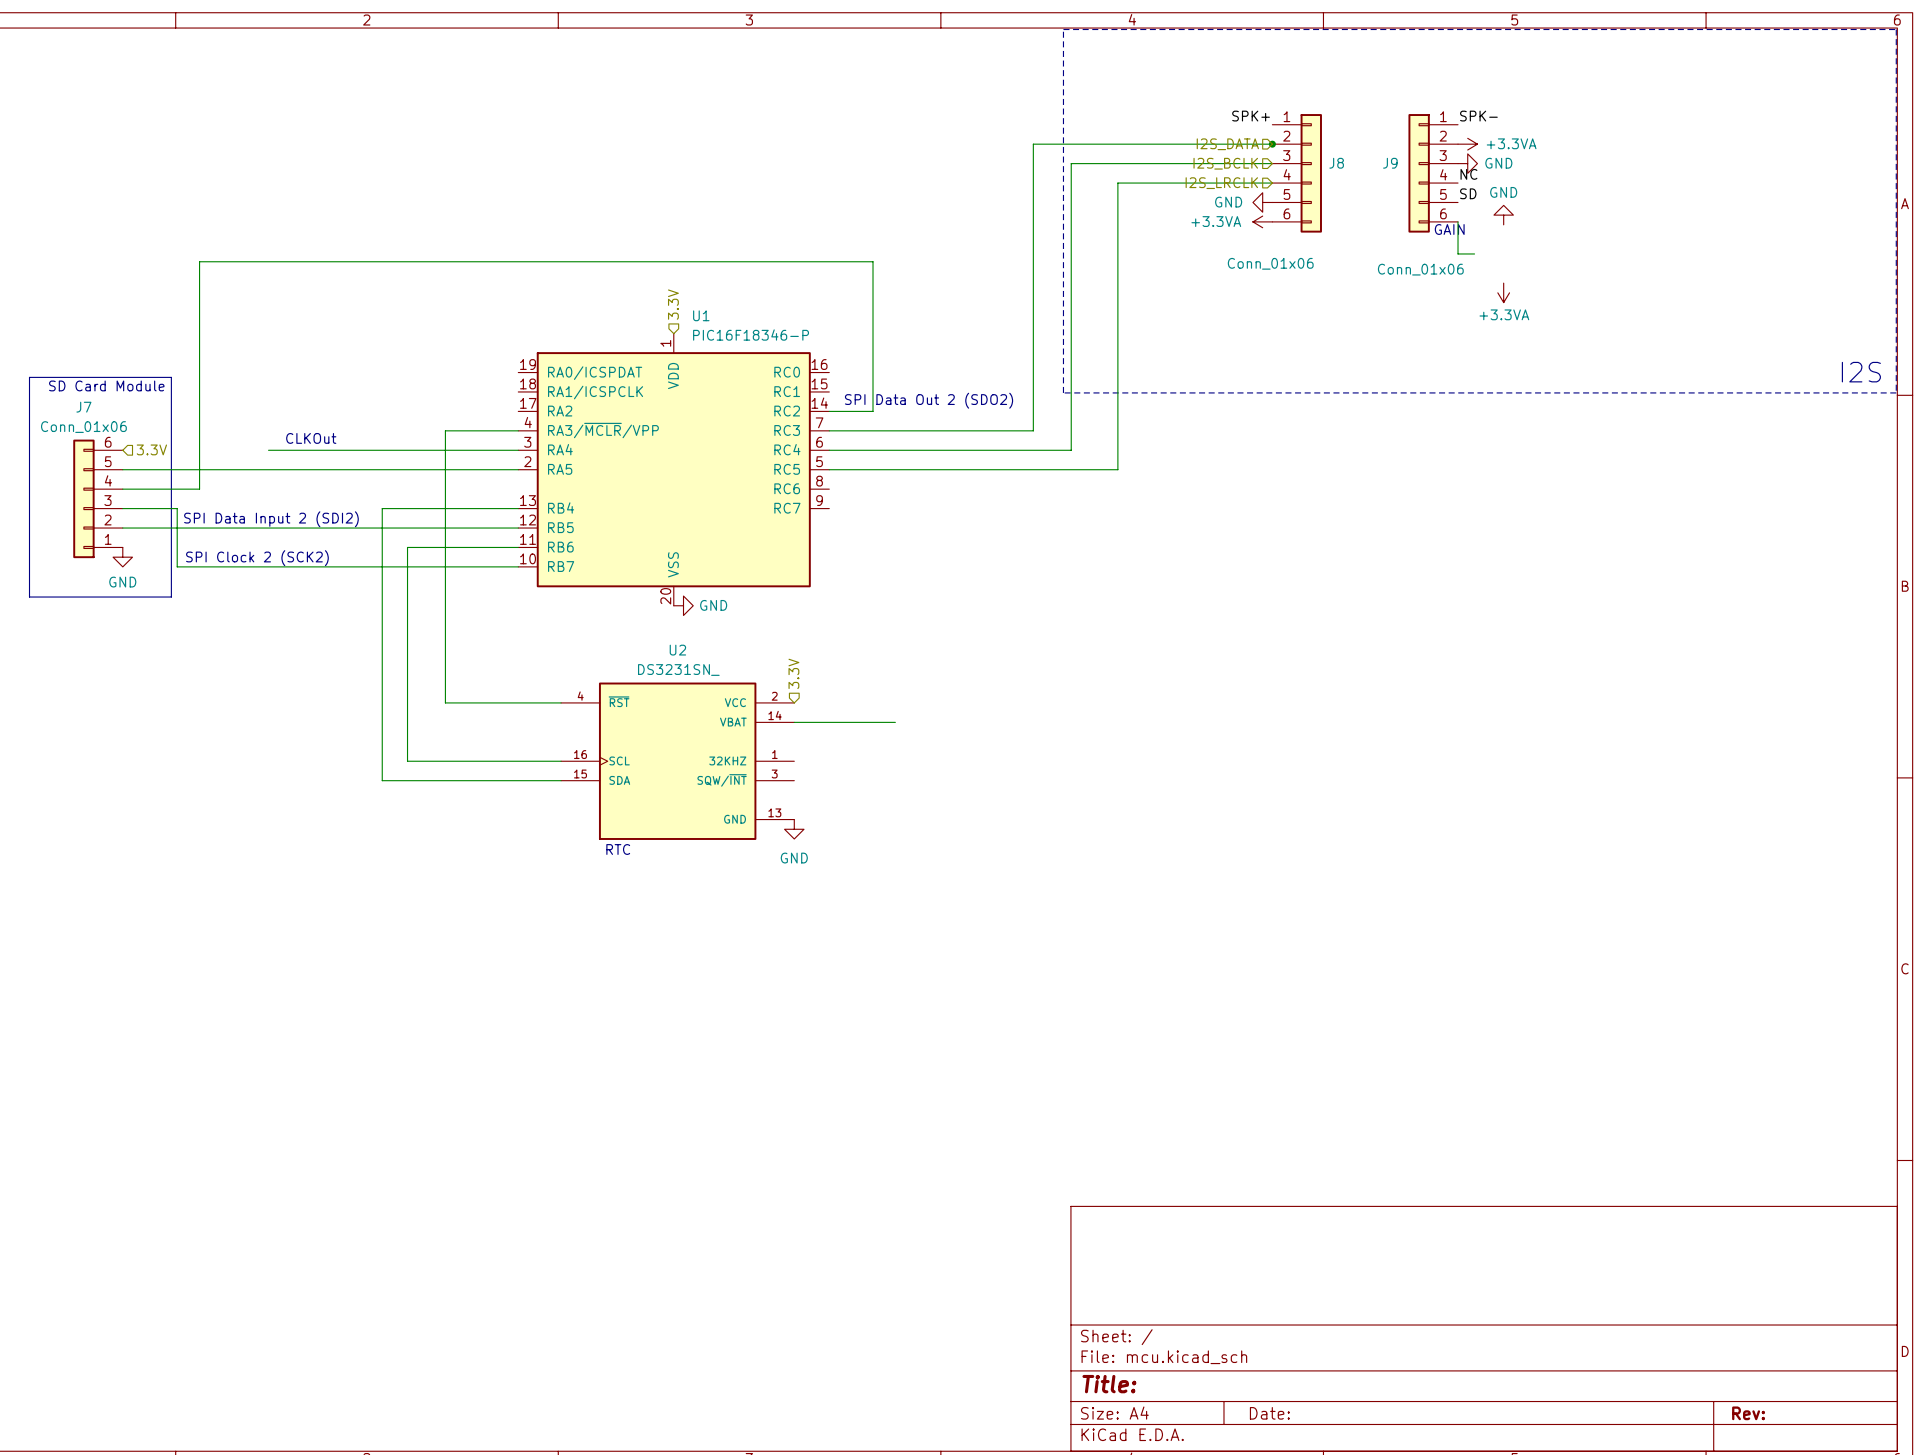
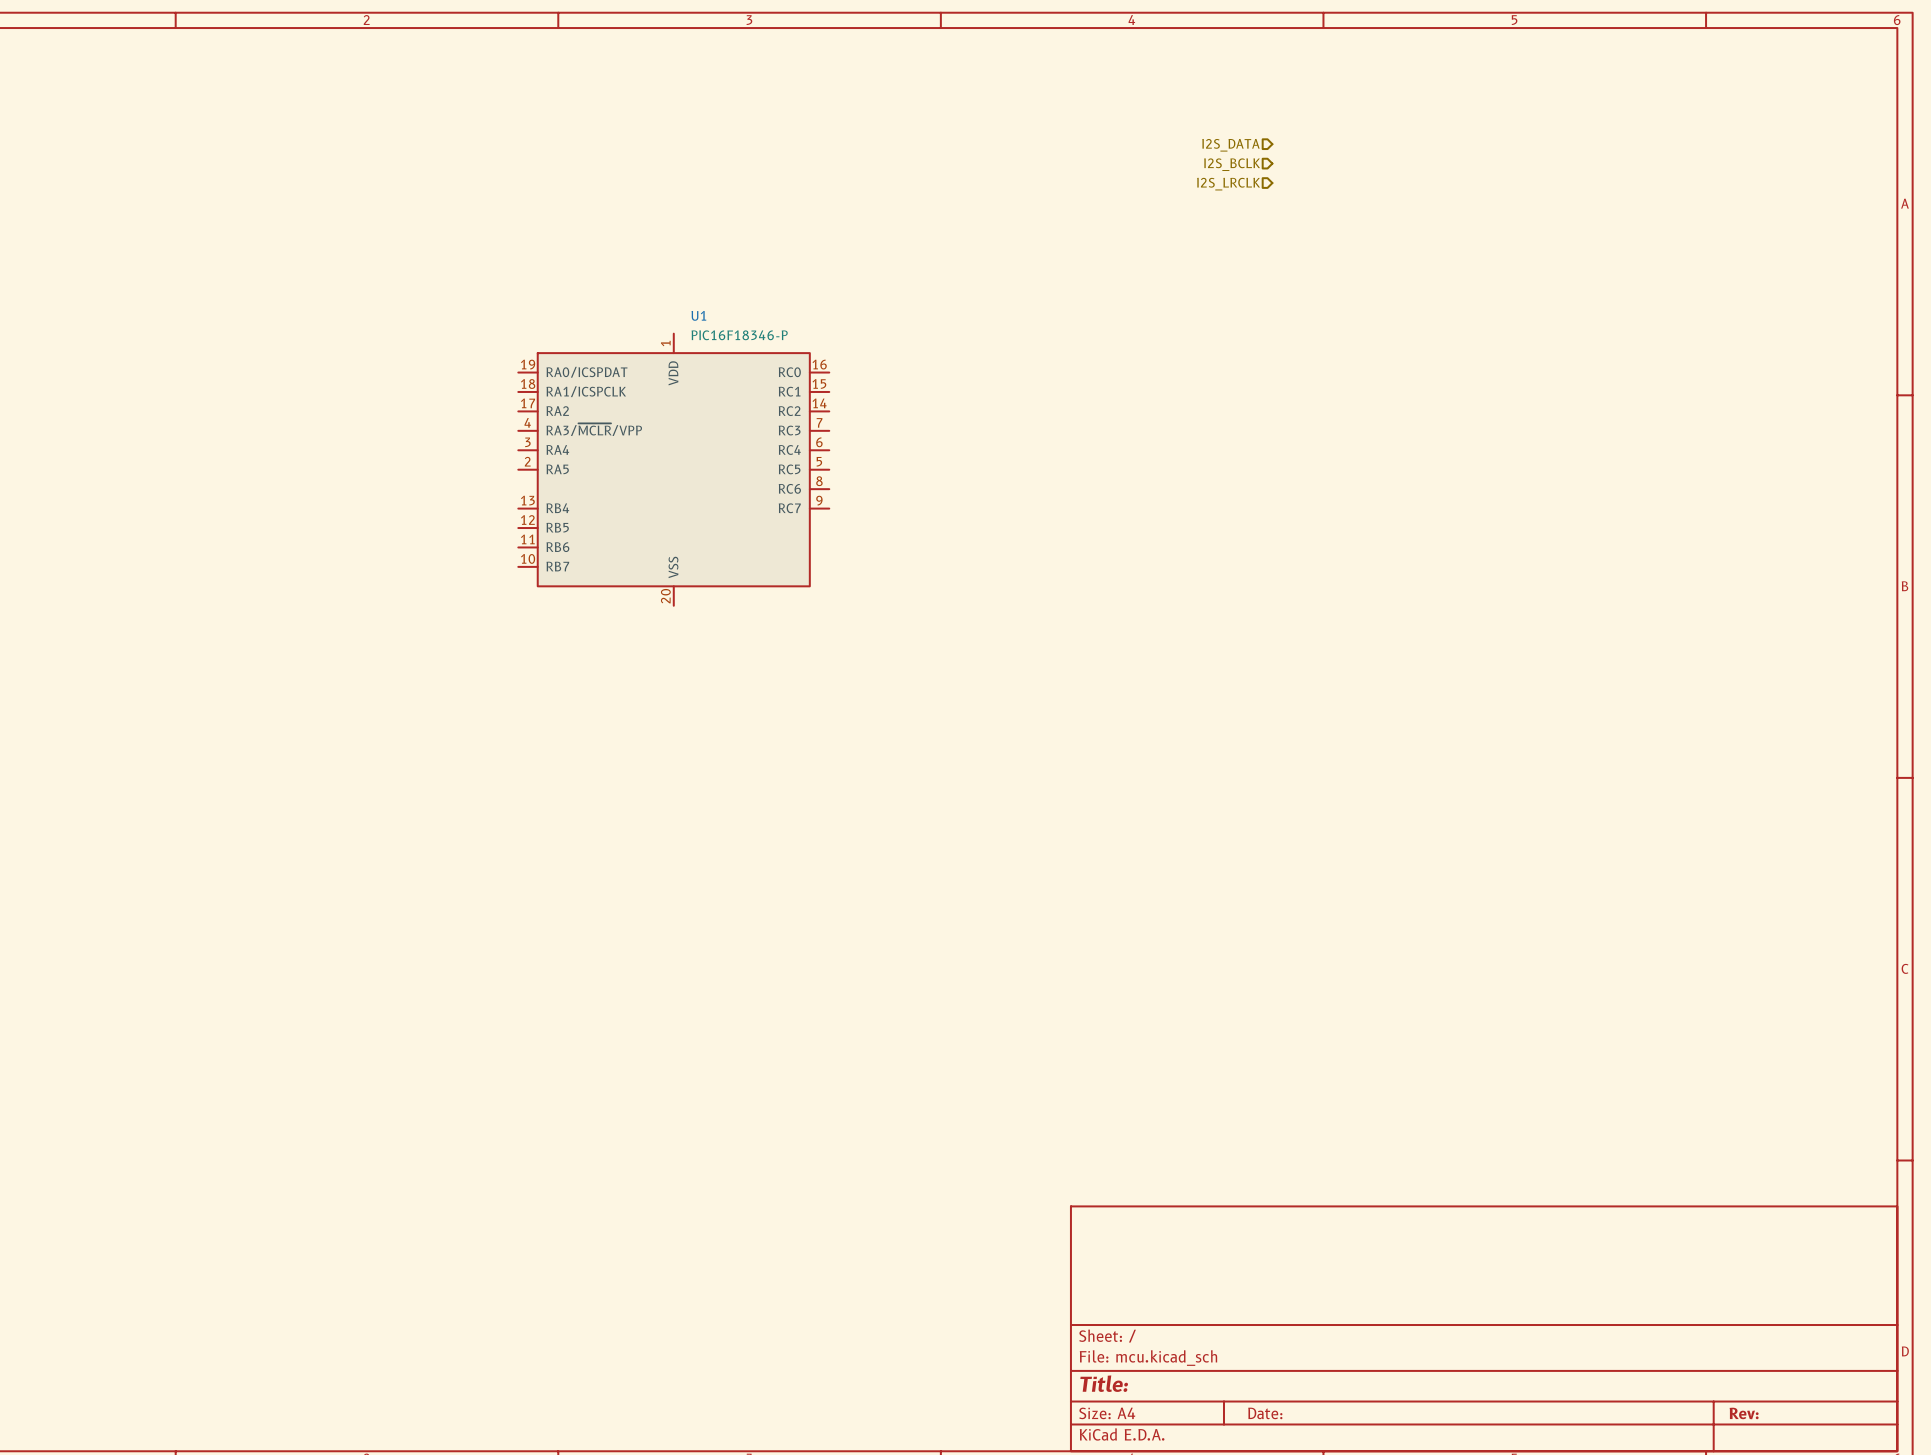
line: (1063, 29) (1896, 29) (1896, 392) (1063, 392) (1063, 29) -> none
label: SPK+ (1251, 116) -> none
label: SPK- (1478, 116) -> none
junction: (1272, 144) -> none
wire: (1273, 144) (1033, 144) (1033, 430) (829, 430) -> none
power symbol: +3.3VA (1467, 144) -> none
wire: (1272, 163) (1071, 163) (1071, 450) (829, 450) -> none
power symbol: GND (1467, 163) -> none
J8: Conn_01x06 (1297, 173) -> none
J9: Conn_01x06 (1433, 173) -> none
label: NC (1468, 174) -> none
wire: (1272, 183) (1117, 183) (1117, 469) (829, 469) -> none
label: SD (1468, 193) -> none
power symbol: GND (1262, 202) -> none
power symbol: GND (1503, 215) -> none
power symbol: +3.3VA (1262, 221) -> none
wire: (1458, 221) (1458, 253) (1474, 253) -> none
text: GAIN (1449, 229) -> none
power symbol: +3.3VA (1503, 292) -> none
hierarchical label: 3.3V (673, 304) -> none
text: I2S (1861, 372) -> none
line: (29, 377) (171, 377) (171, 597) (29, 597) (29, 377) -> none
text: SD Card Module (106, 385) -> none
text: SPI Data Out 2 (SDO2) (929, 400) -> none
wire: (829, 411) (873, 411) (873, 261) (199, 261) (199, 489) (122, 489) -> none
wire: (518, 430) (445, 430) (445, 702) (561, 702) -> none
text: CLKOut (311, 438) -> none
hierarchical label: 3.3V (151, 449) -> none
wire: (268, 450) (518, 450) -> none
wire: (122, 469) (518, 469) -> none
J7: Conn_01x06 (98, 498) -> none
wire: (122, 508) (177, 508) (177, 566) (518, 566) -> none
wire: (518, 508) (382, 508) (382, 780) (561, 780) -> none
text: SPI Data Input 2 (SDI2) (271, 519) -> none
wire: (122, 528) (518, 528) -> none
wire: (518, 547) (407, 547) (407, 761) (561, 761) -> none
power symbol: GND (122, 557) -> none
text: SPI Clock 2 (SCK2) (257, 558) -> none
power symbol: GND (683, 605) -> none
hierarchical label: 3.3V (793, 673) -> none
wire: (794, 722) (895, 722) -> none
U2: DS3231SN_ (677, 761) -> none
power symbol: GND (794, 829) -> none
text: RTC (618, 849) -> none

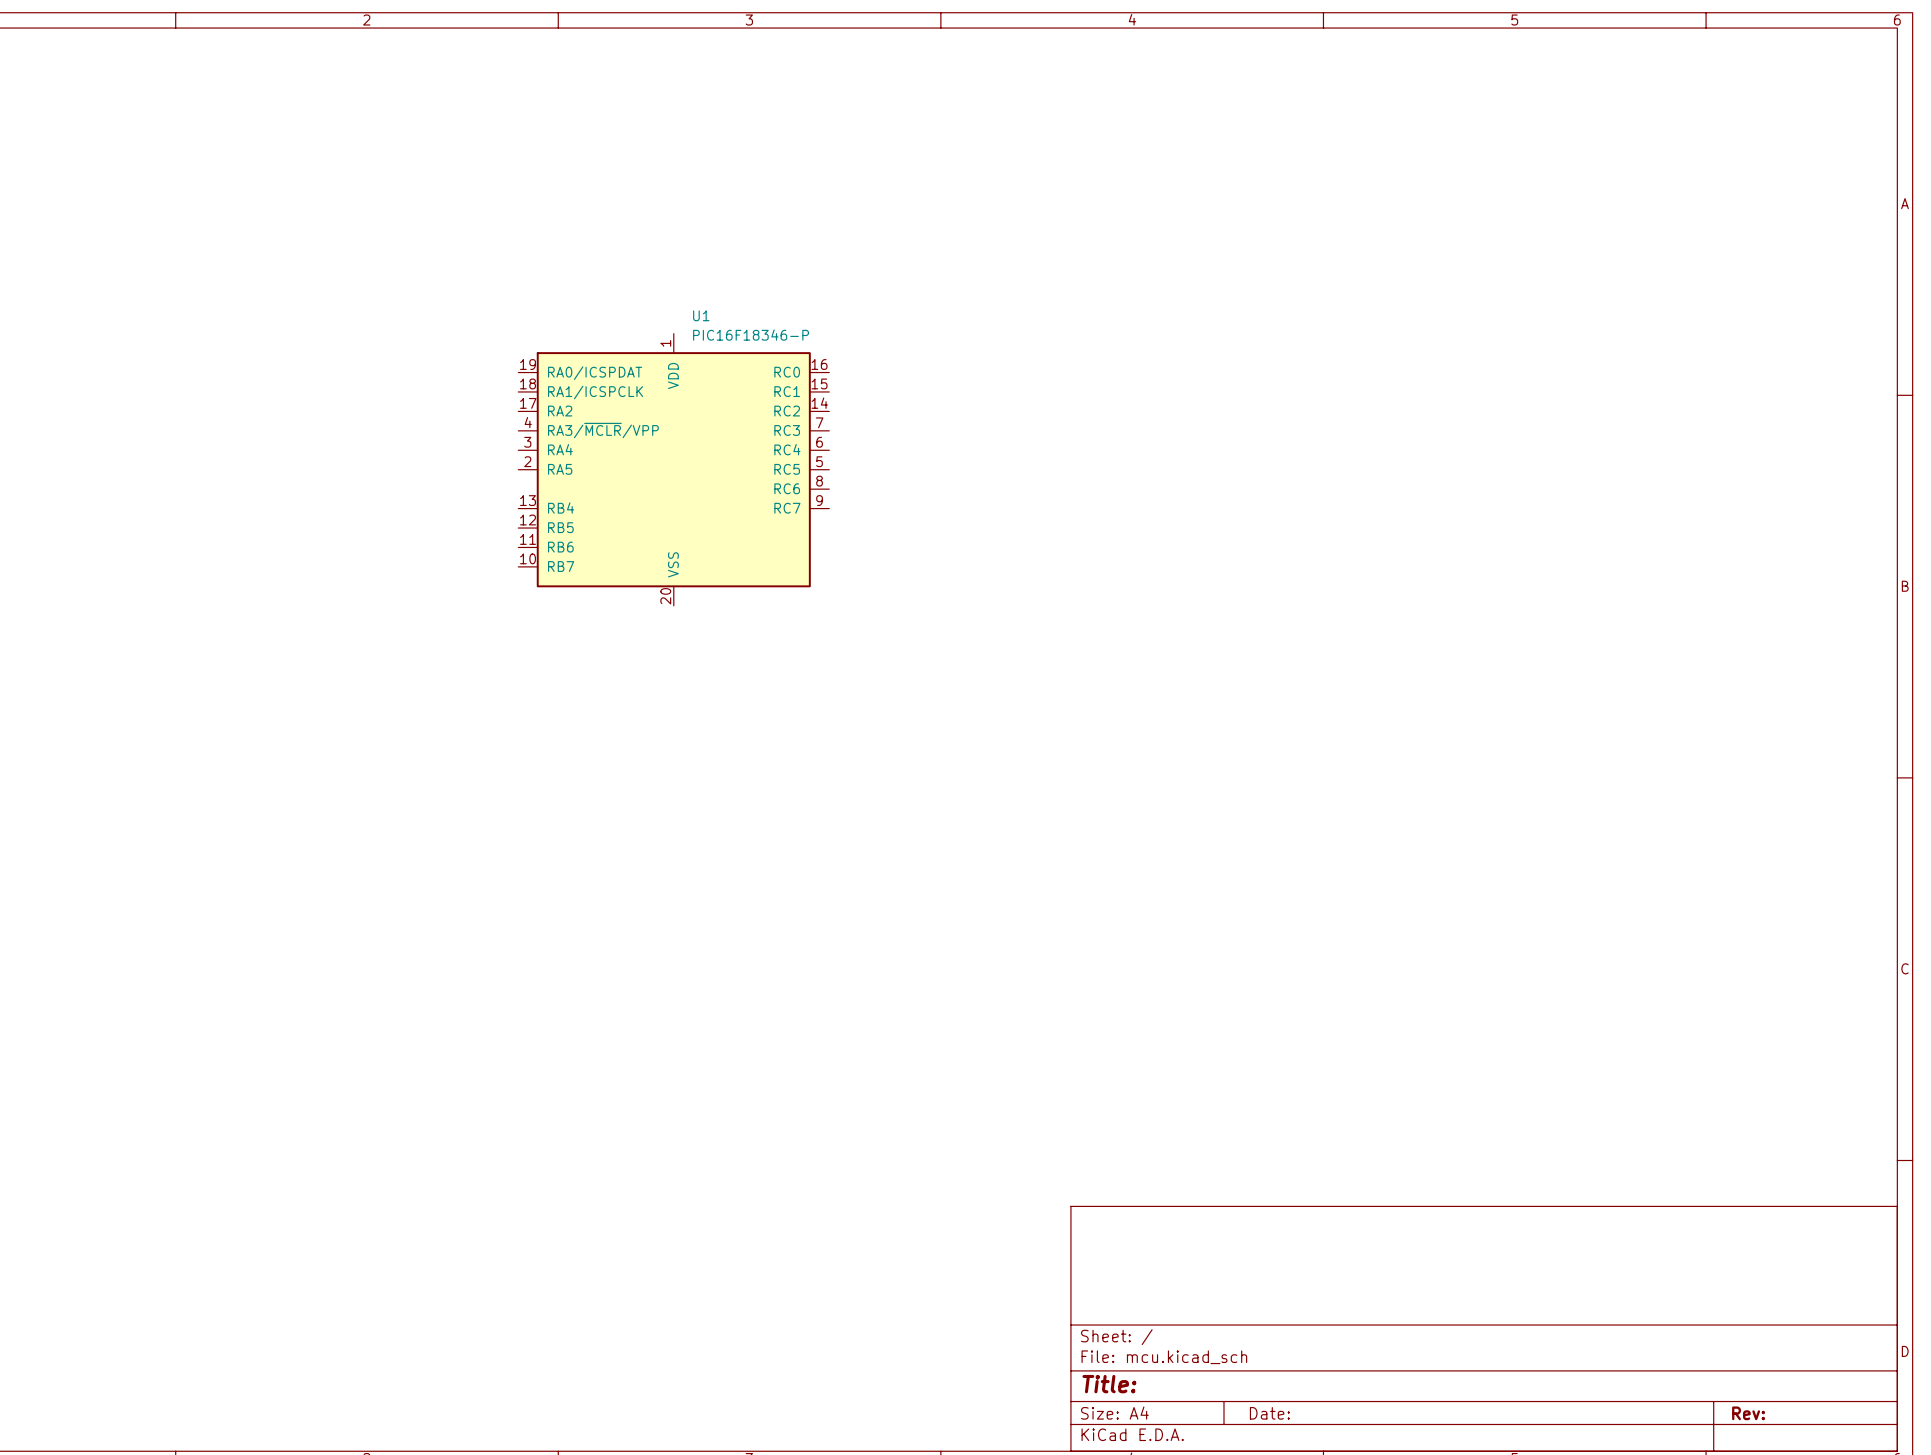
hierarchical label: I2S_DATA (1230, 145) -> none
hierarchical label: I2S_BCLK (1232, 164) -> none
hierarchical label: I2S_LRCLK (1228, 184) -> none

